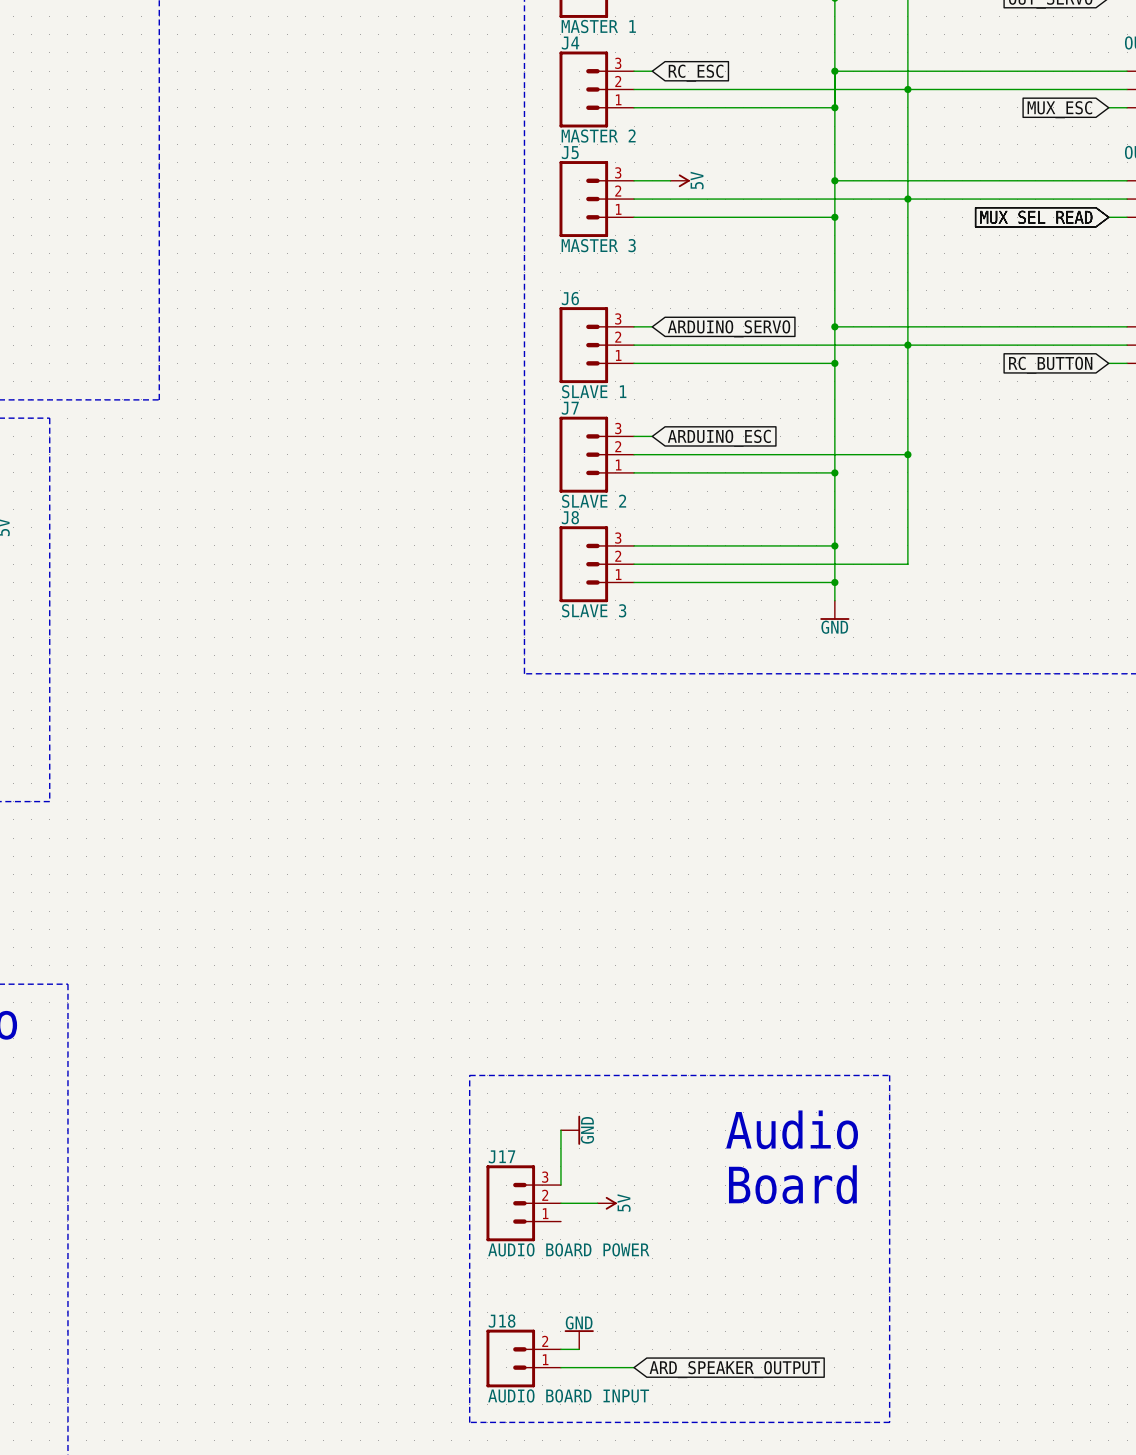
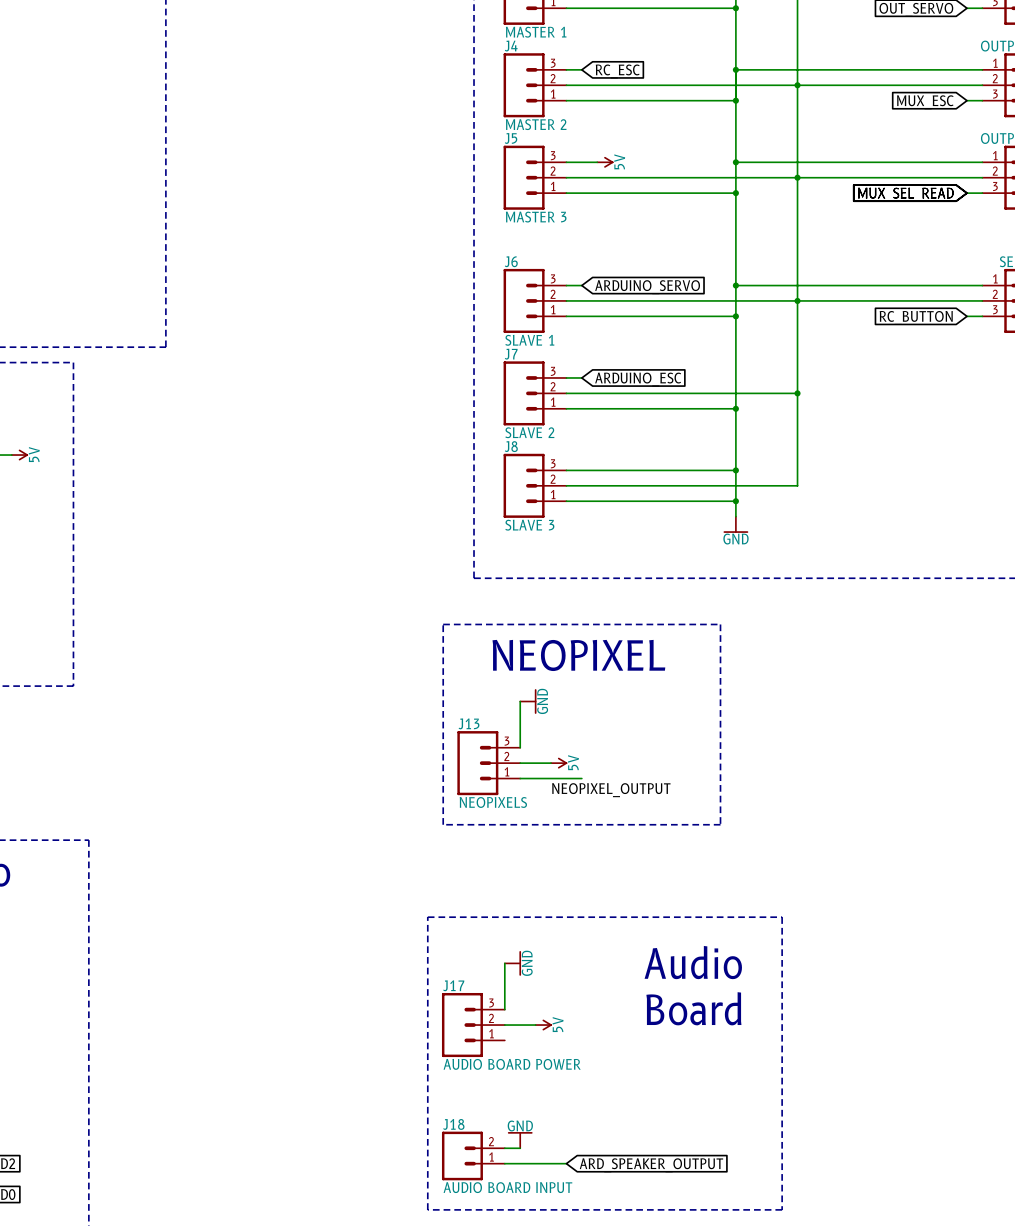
line: none -> (443, 624) (443, 824) (720, 824) (720, 624) (443, 624)
text: none -> NEOPIXEL (578, 655)
wire: none -> (520, 701) (520, 747)
power symbol: none -> GND (528, 701)
J13: none -> NEOPIXELS (488, 763)
wire: none -> (520, 763) (551, 763)
power symbol: none -> 5V (559, 763)
wire: none -> (520, 778) (581, 778)
label: none -> NEOPIXEL_OUTPUT (611, 790)

